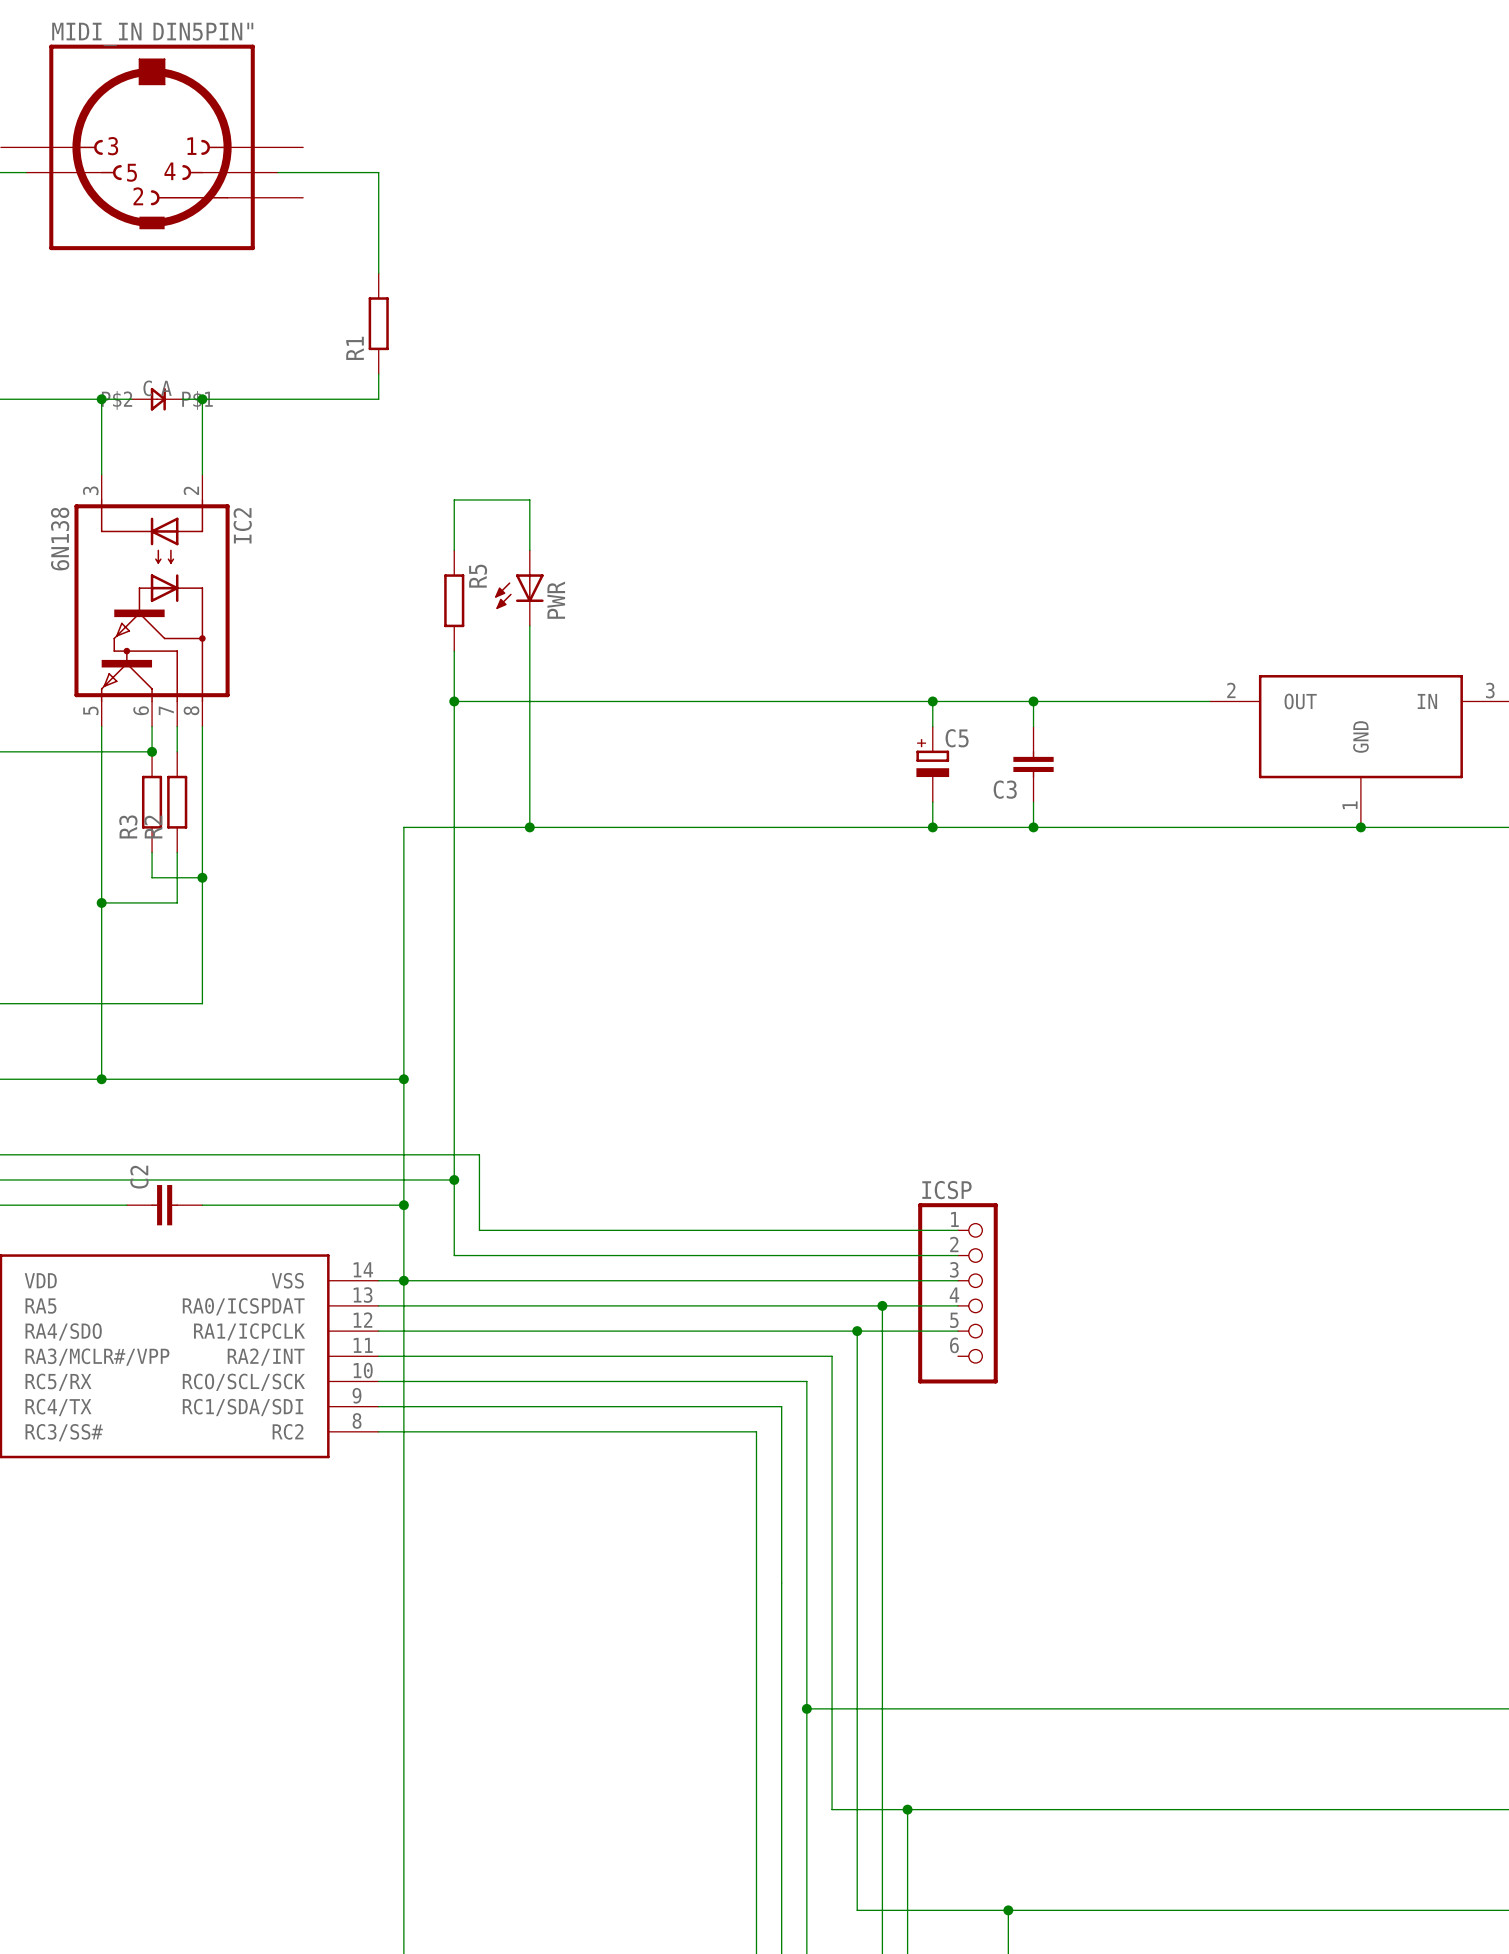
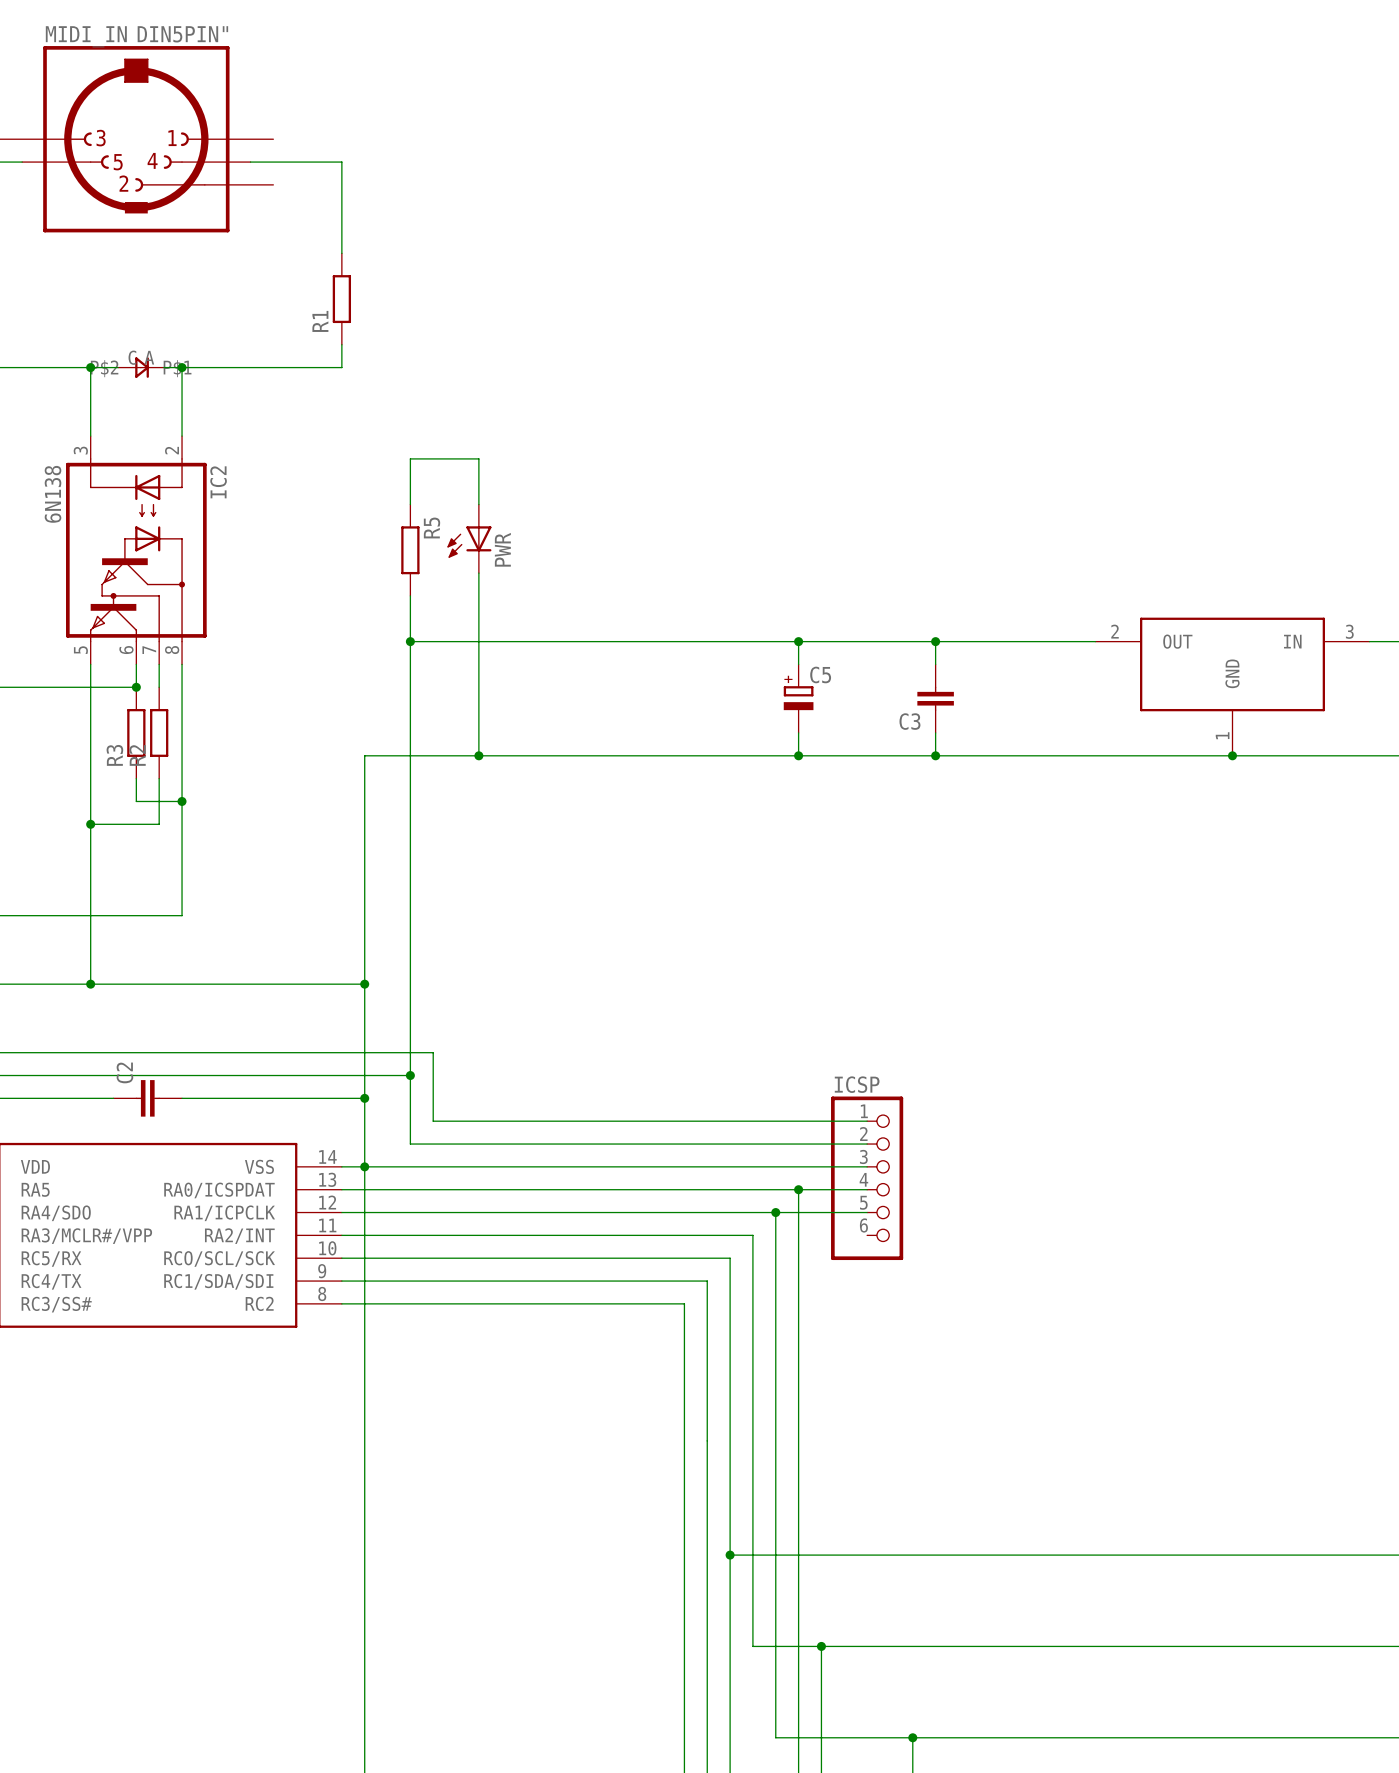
wire: (932, 701) (932, 726) -> (798, 641) (798, 664)
junction position: (932, 701) -> (798, 641)
C5 position: (932, 764) -> (798, 698)
wire: (932, 802) (932, 827) -> (798, 732) (798, 755)
junction position: (932, 827) -> (798, 755)

